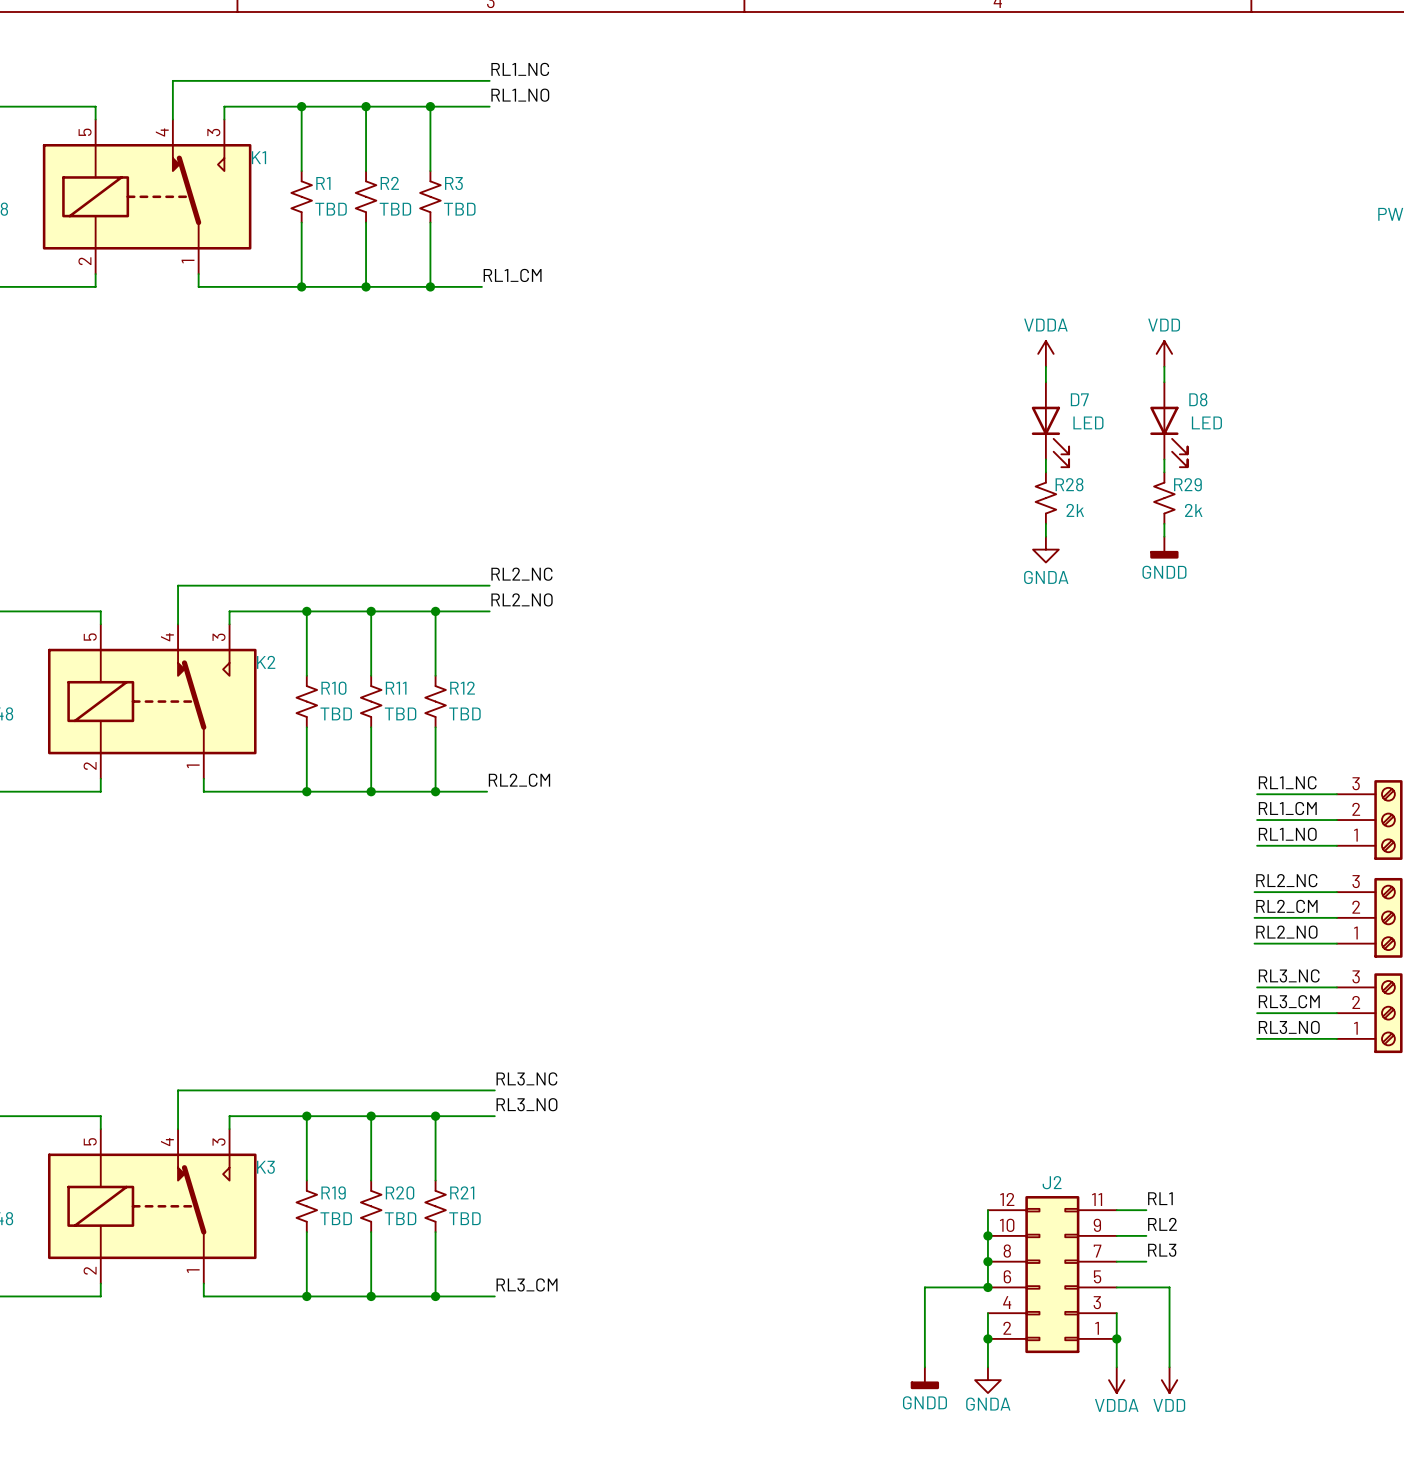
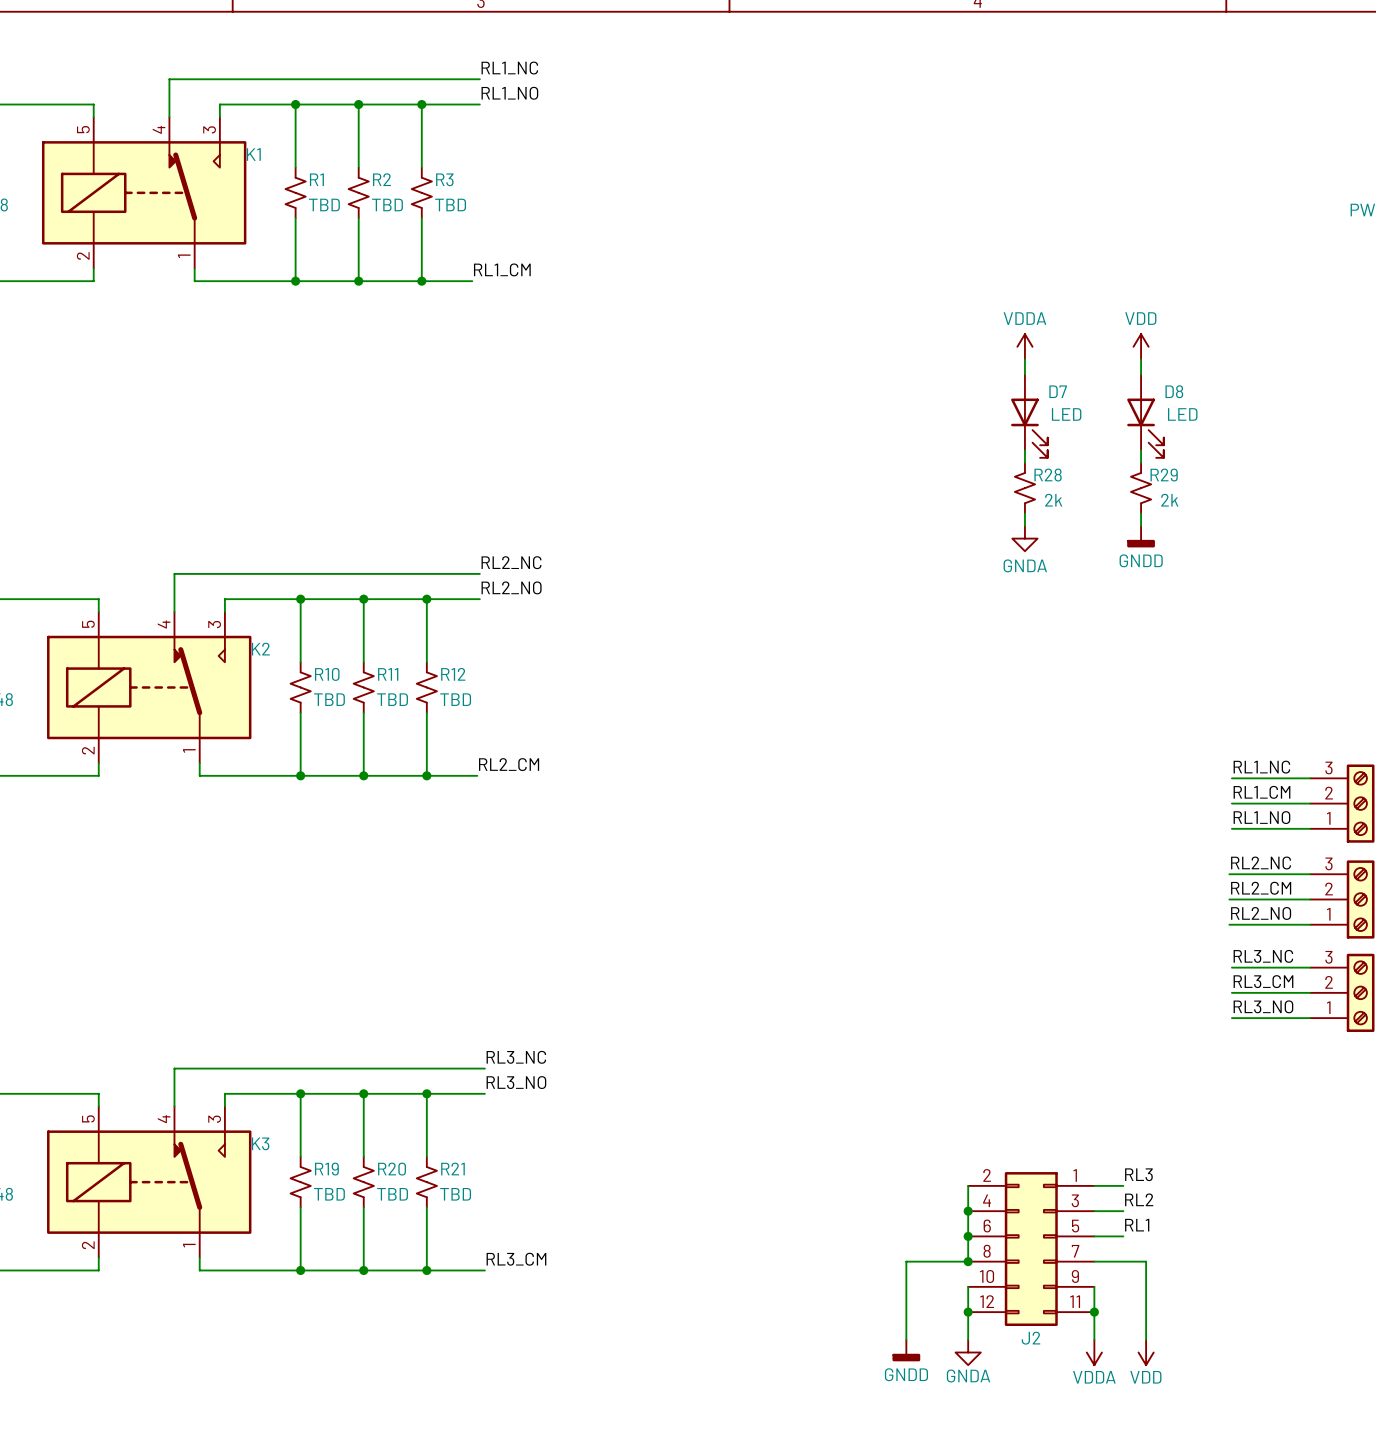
label: RL1 (1160, 1198) -> RL3 (1138, 1174)
label: RL3 (1162, 1250) -> RL1 (1137, 1225)
J2 flip: as is (1052, 1274) -> up-down (1031, 1249)

